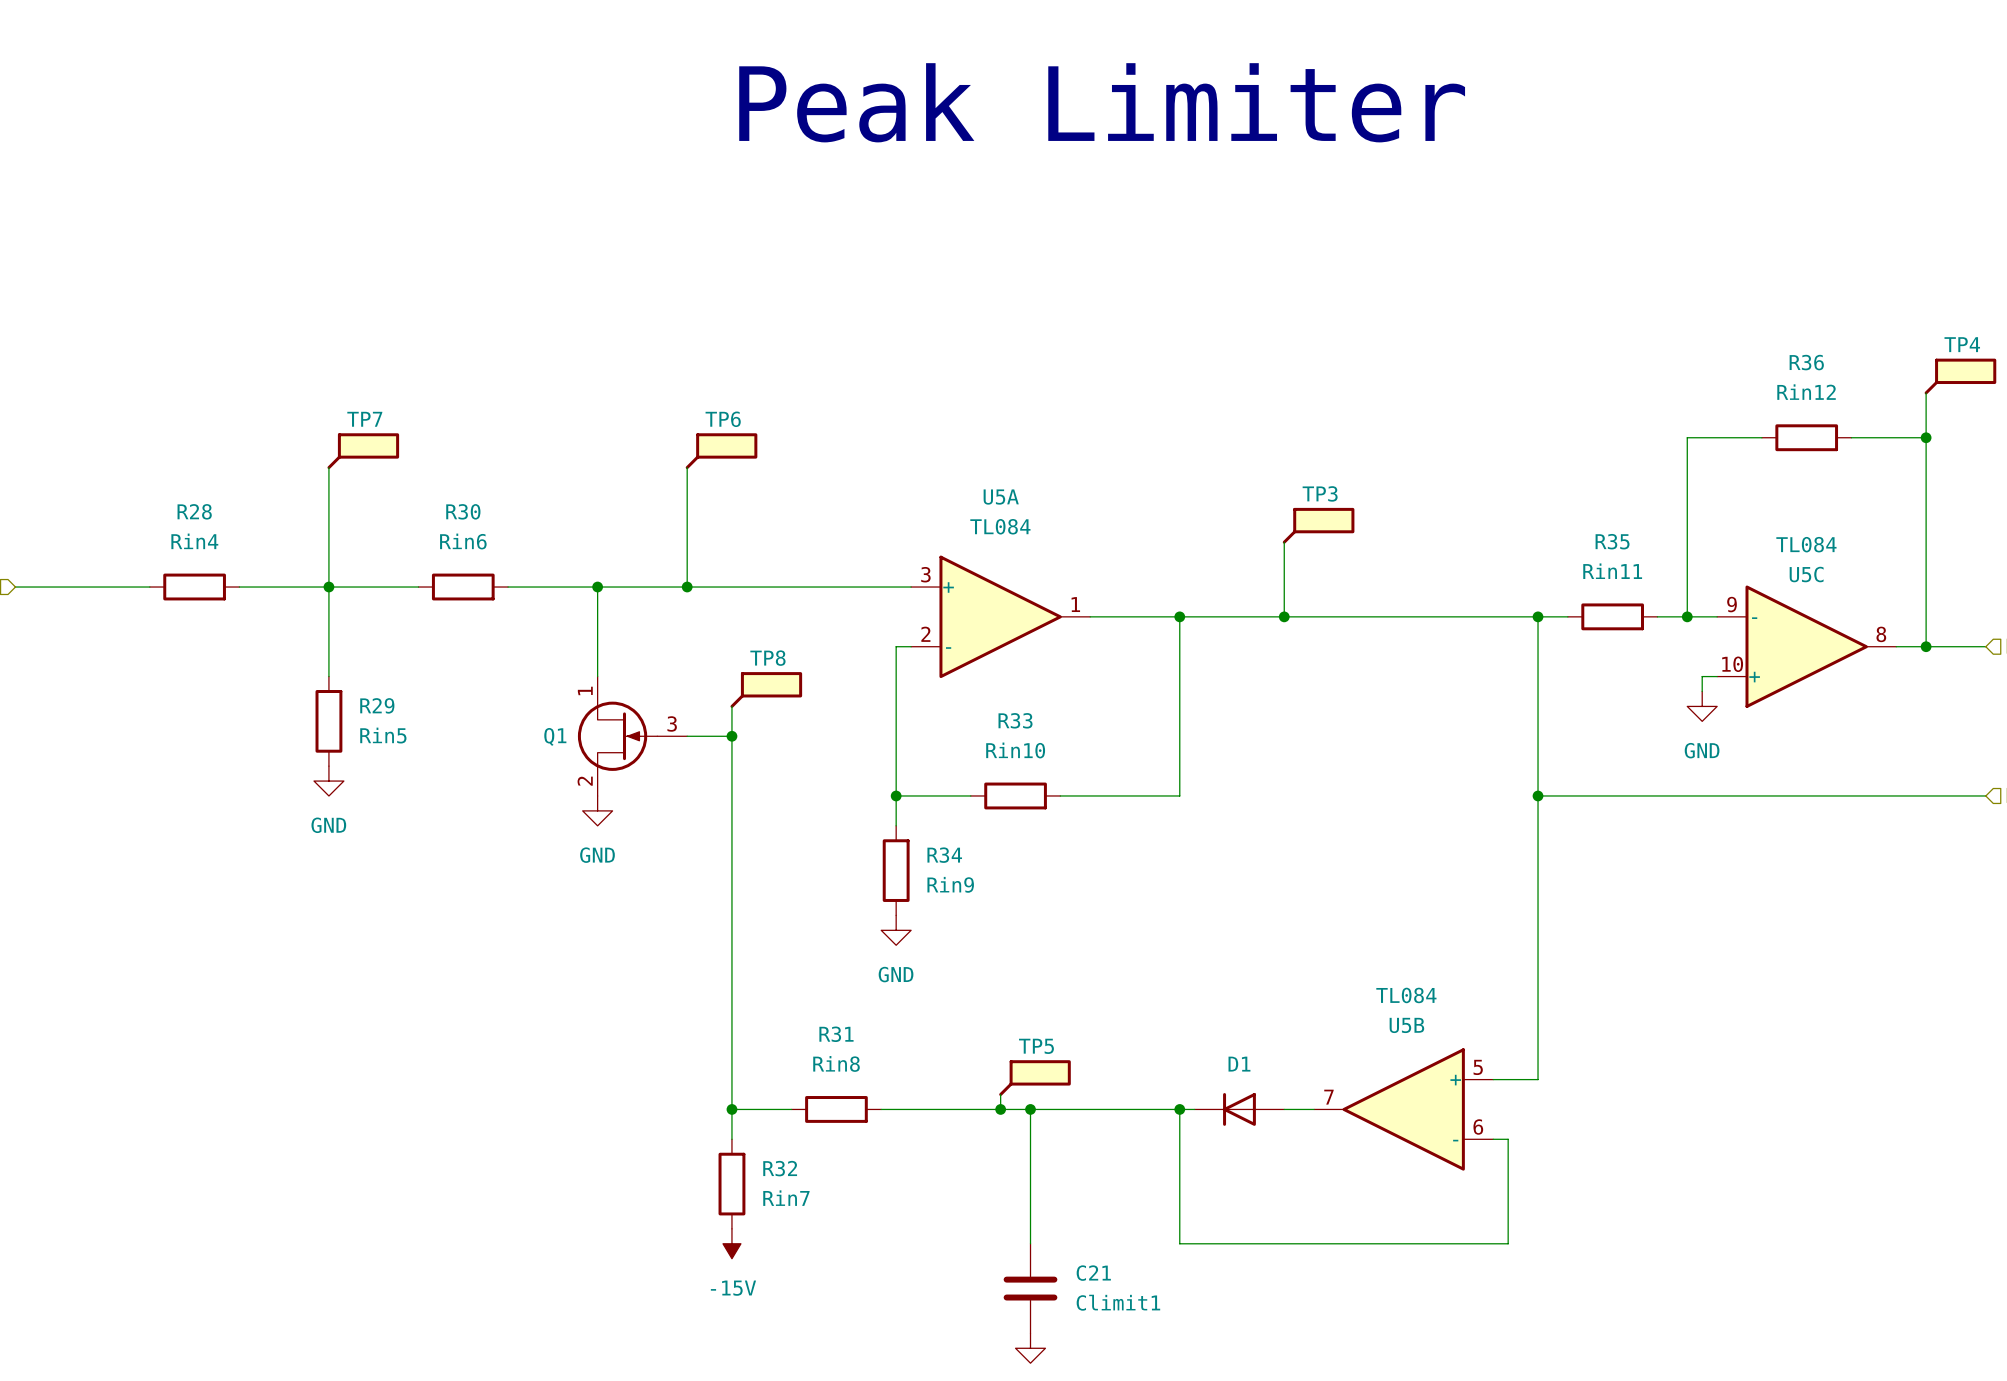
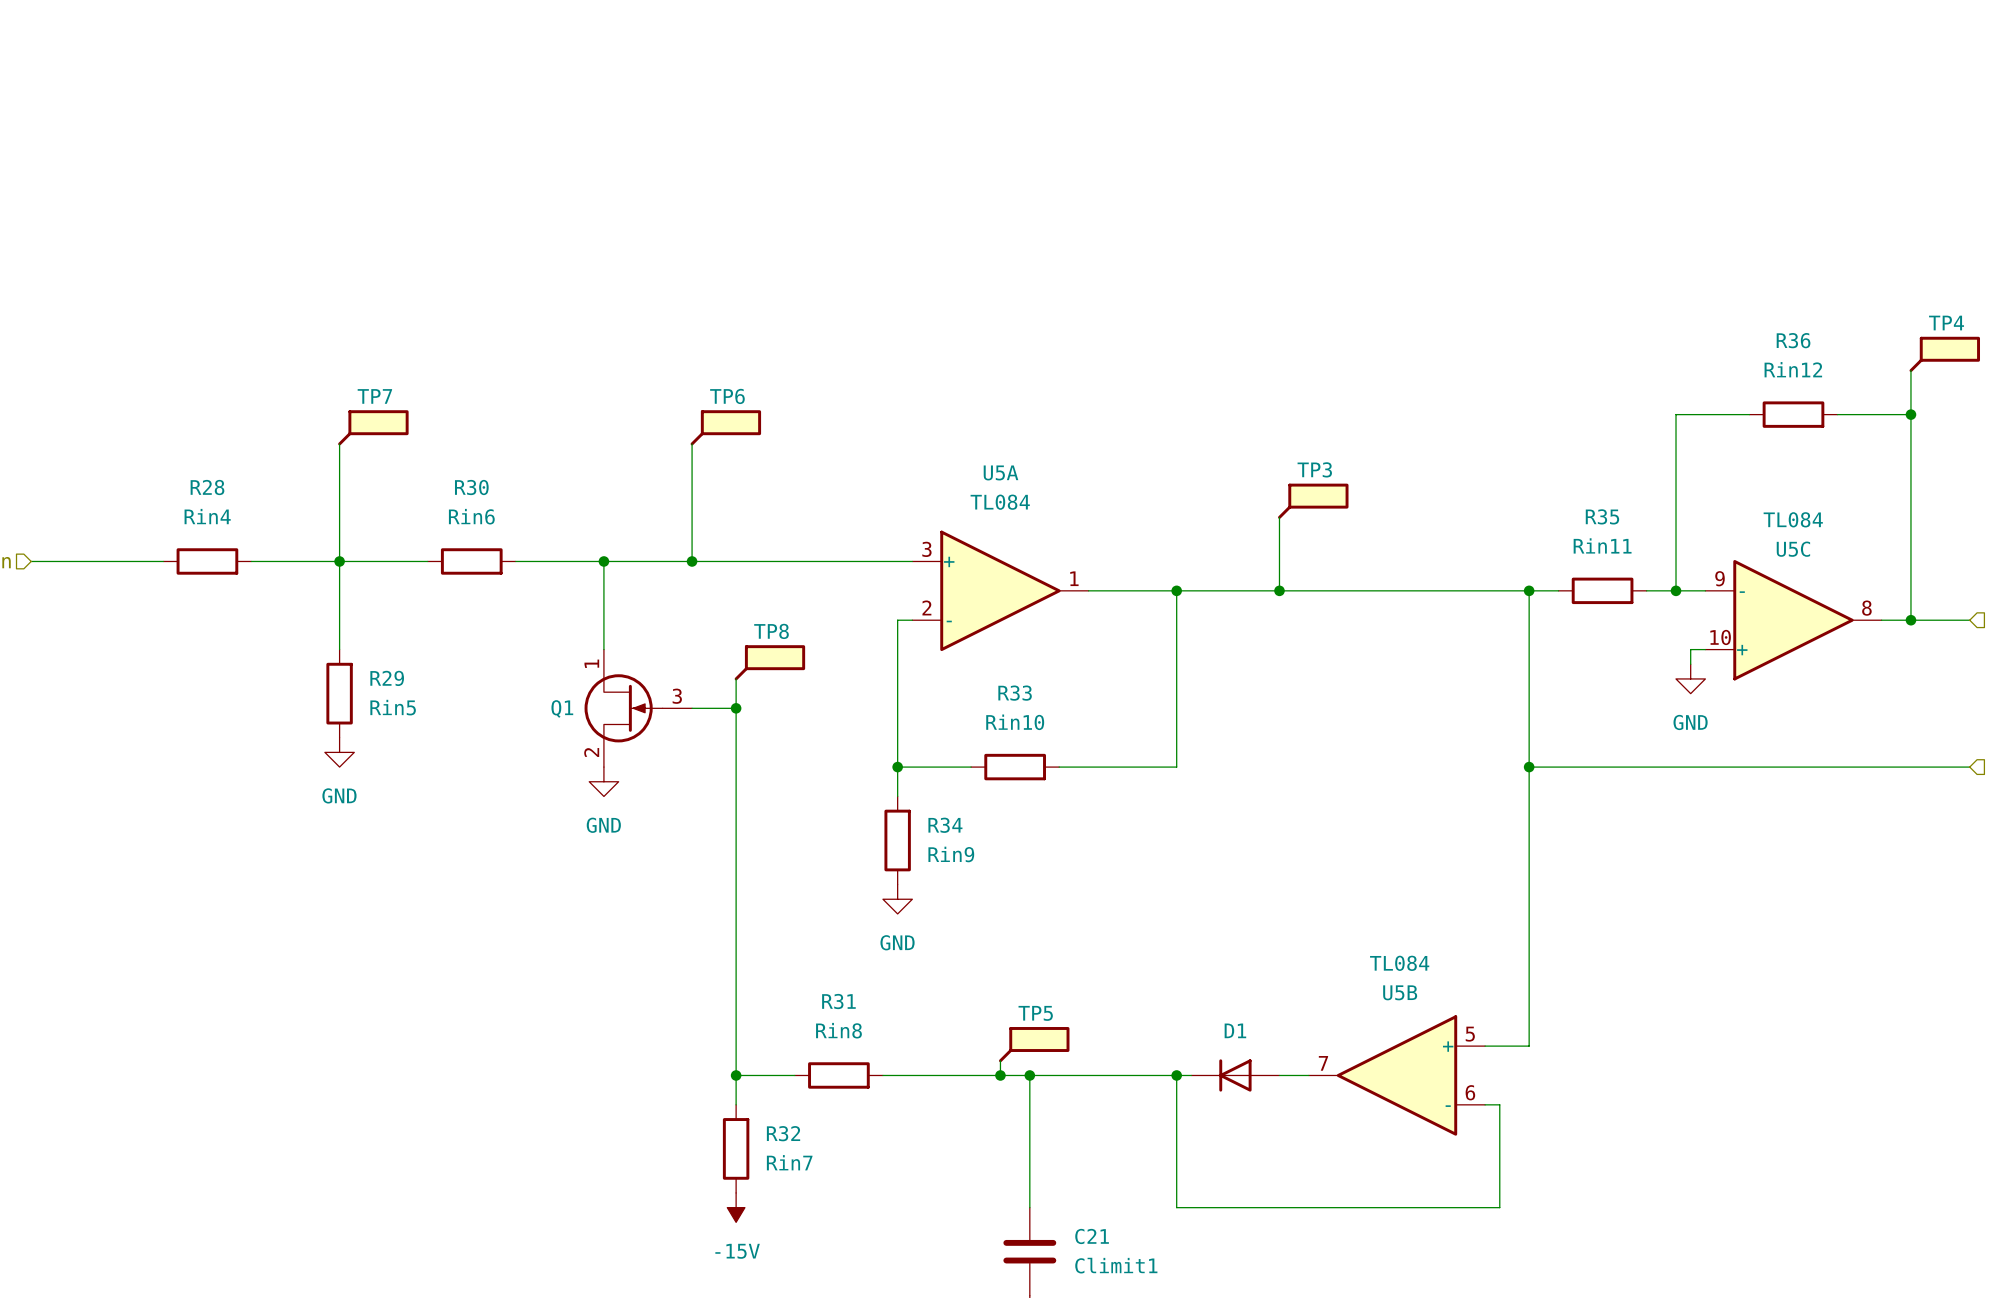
text: Peak Limiter (1102, 102) -> none

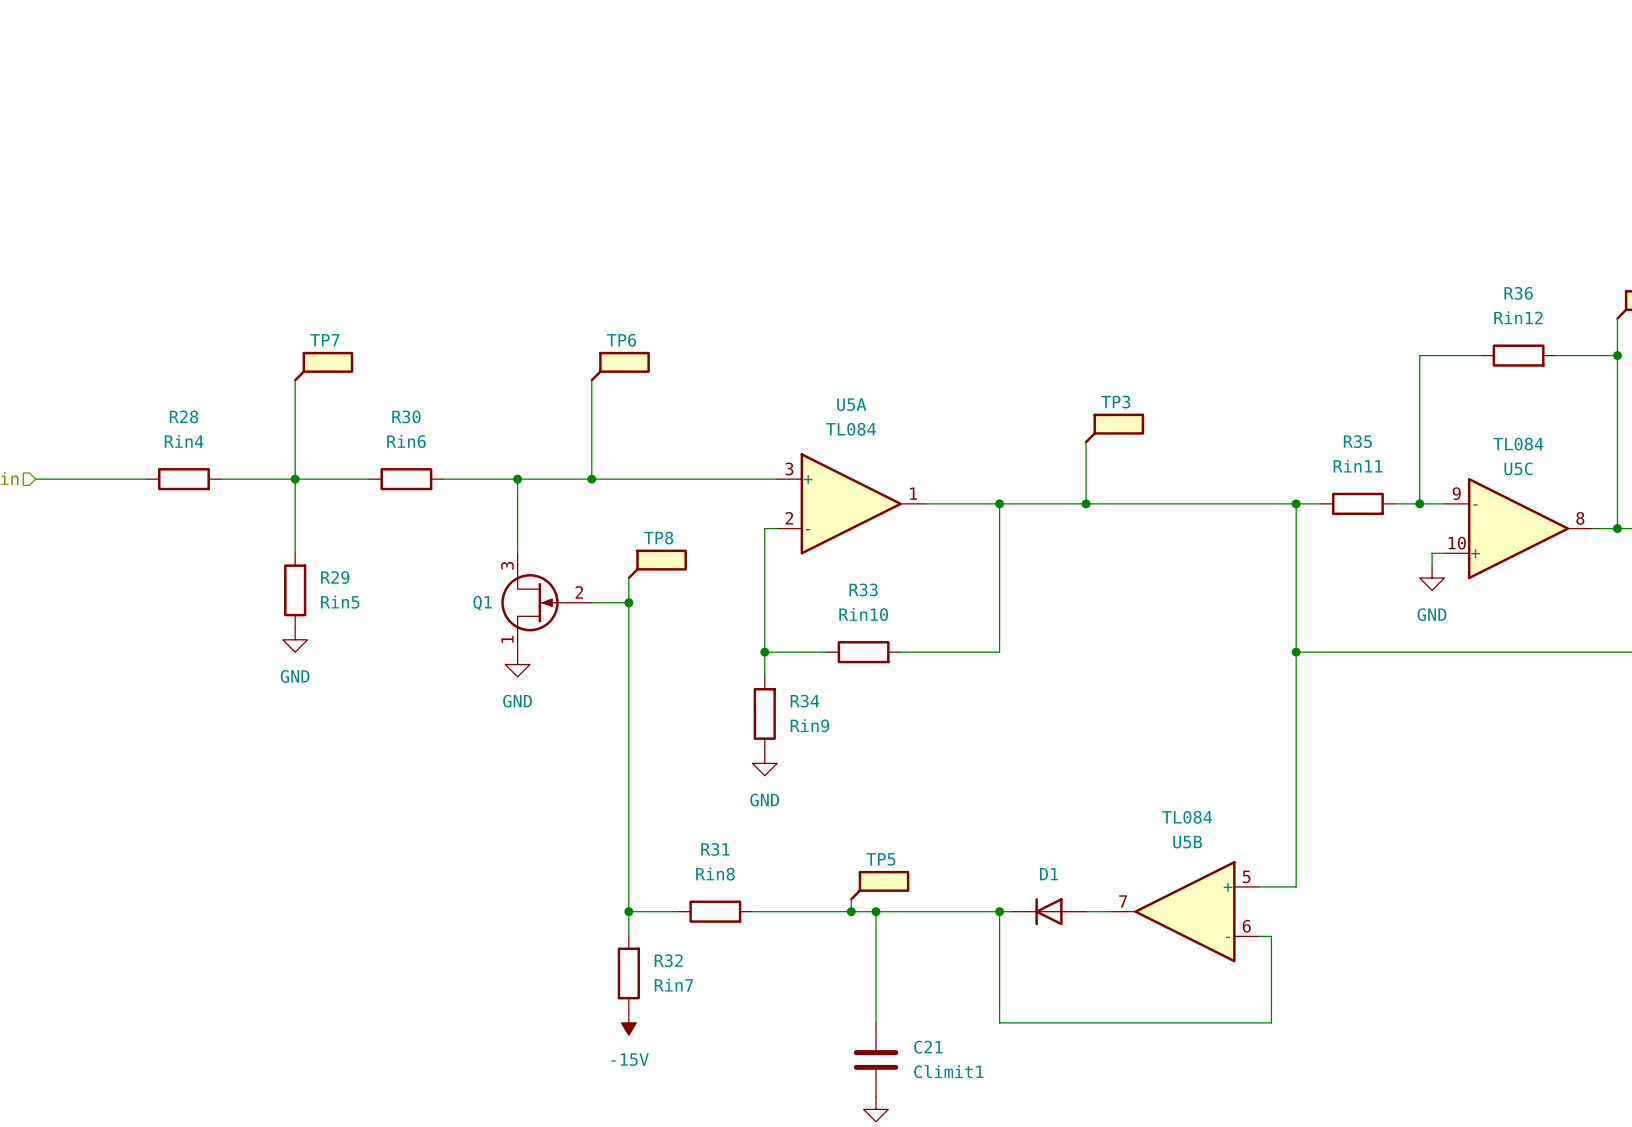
Q1 pin number: 1 (591, 663) -> 3 (507, 565)
Q1 pin number: 3 (677, 696) -> 2 (579, 592)
Q1 pin number: 2 (591, 752) -> 1 (507, 639)

